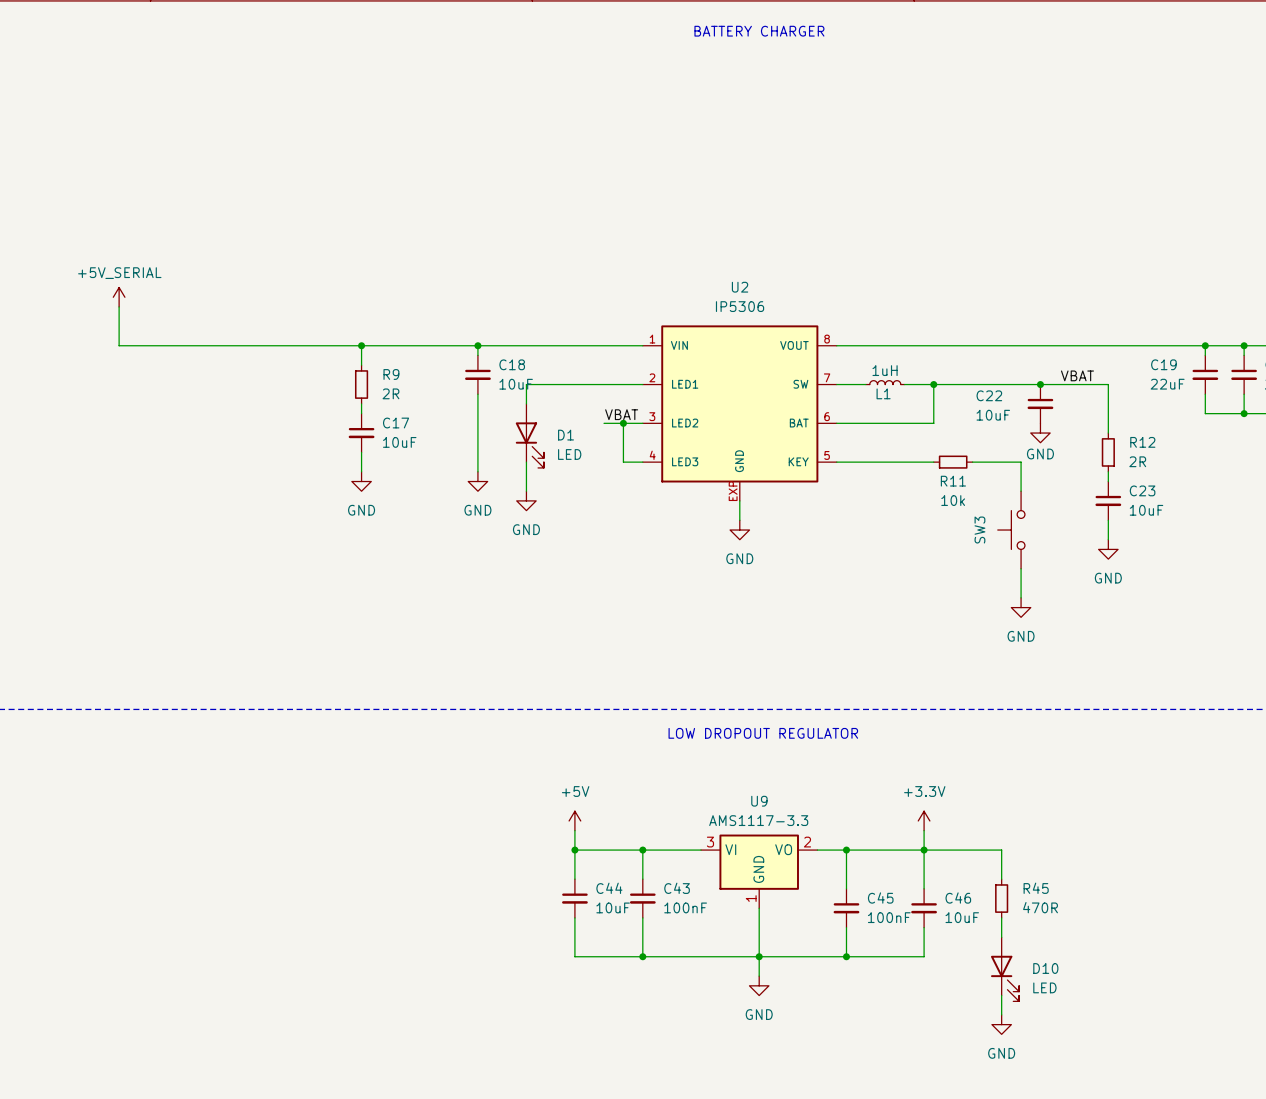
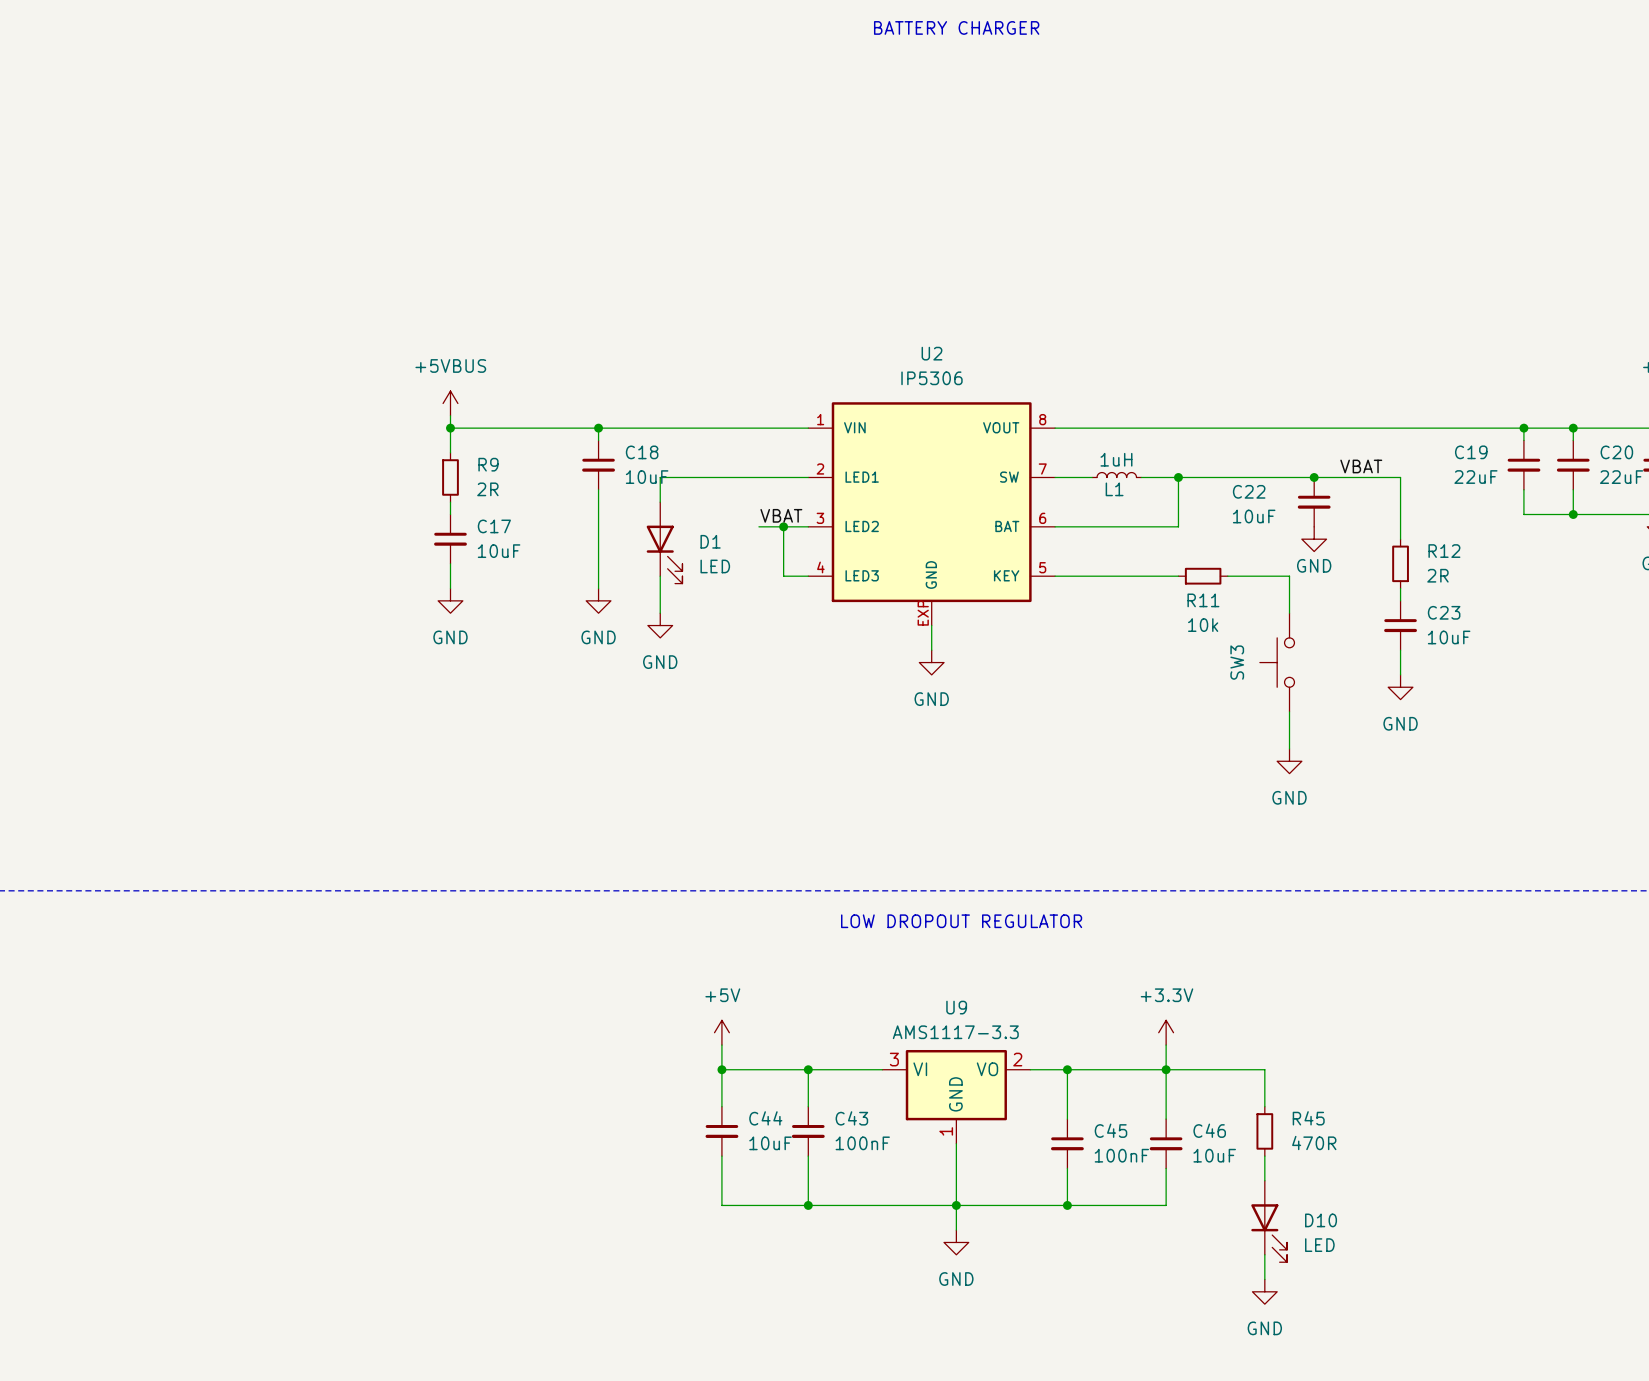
power symbol: +5V_SERIAL (119, 297) -> none
wire: (119, 306) (119, 345) (361, 345) -> (450, 415) (450, 428)
power symbol: none -> +5VBUS (450, 403)

